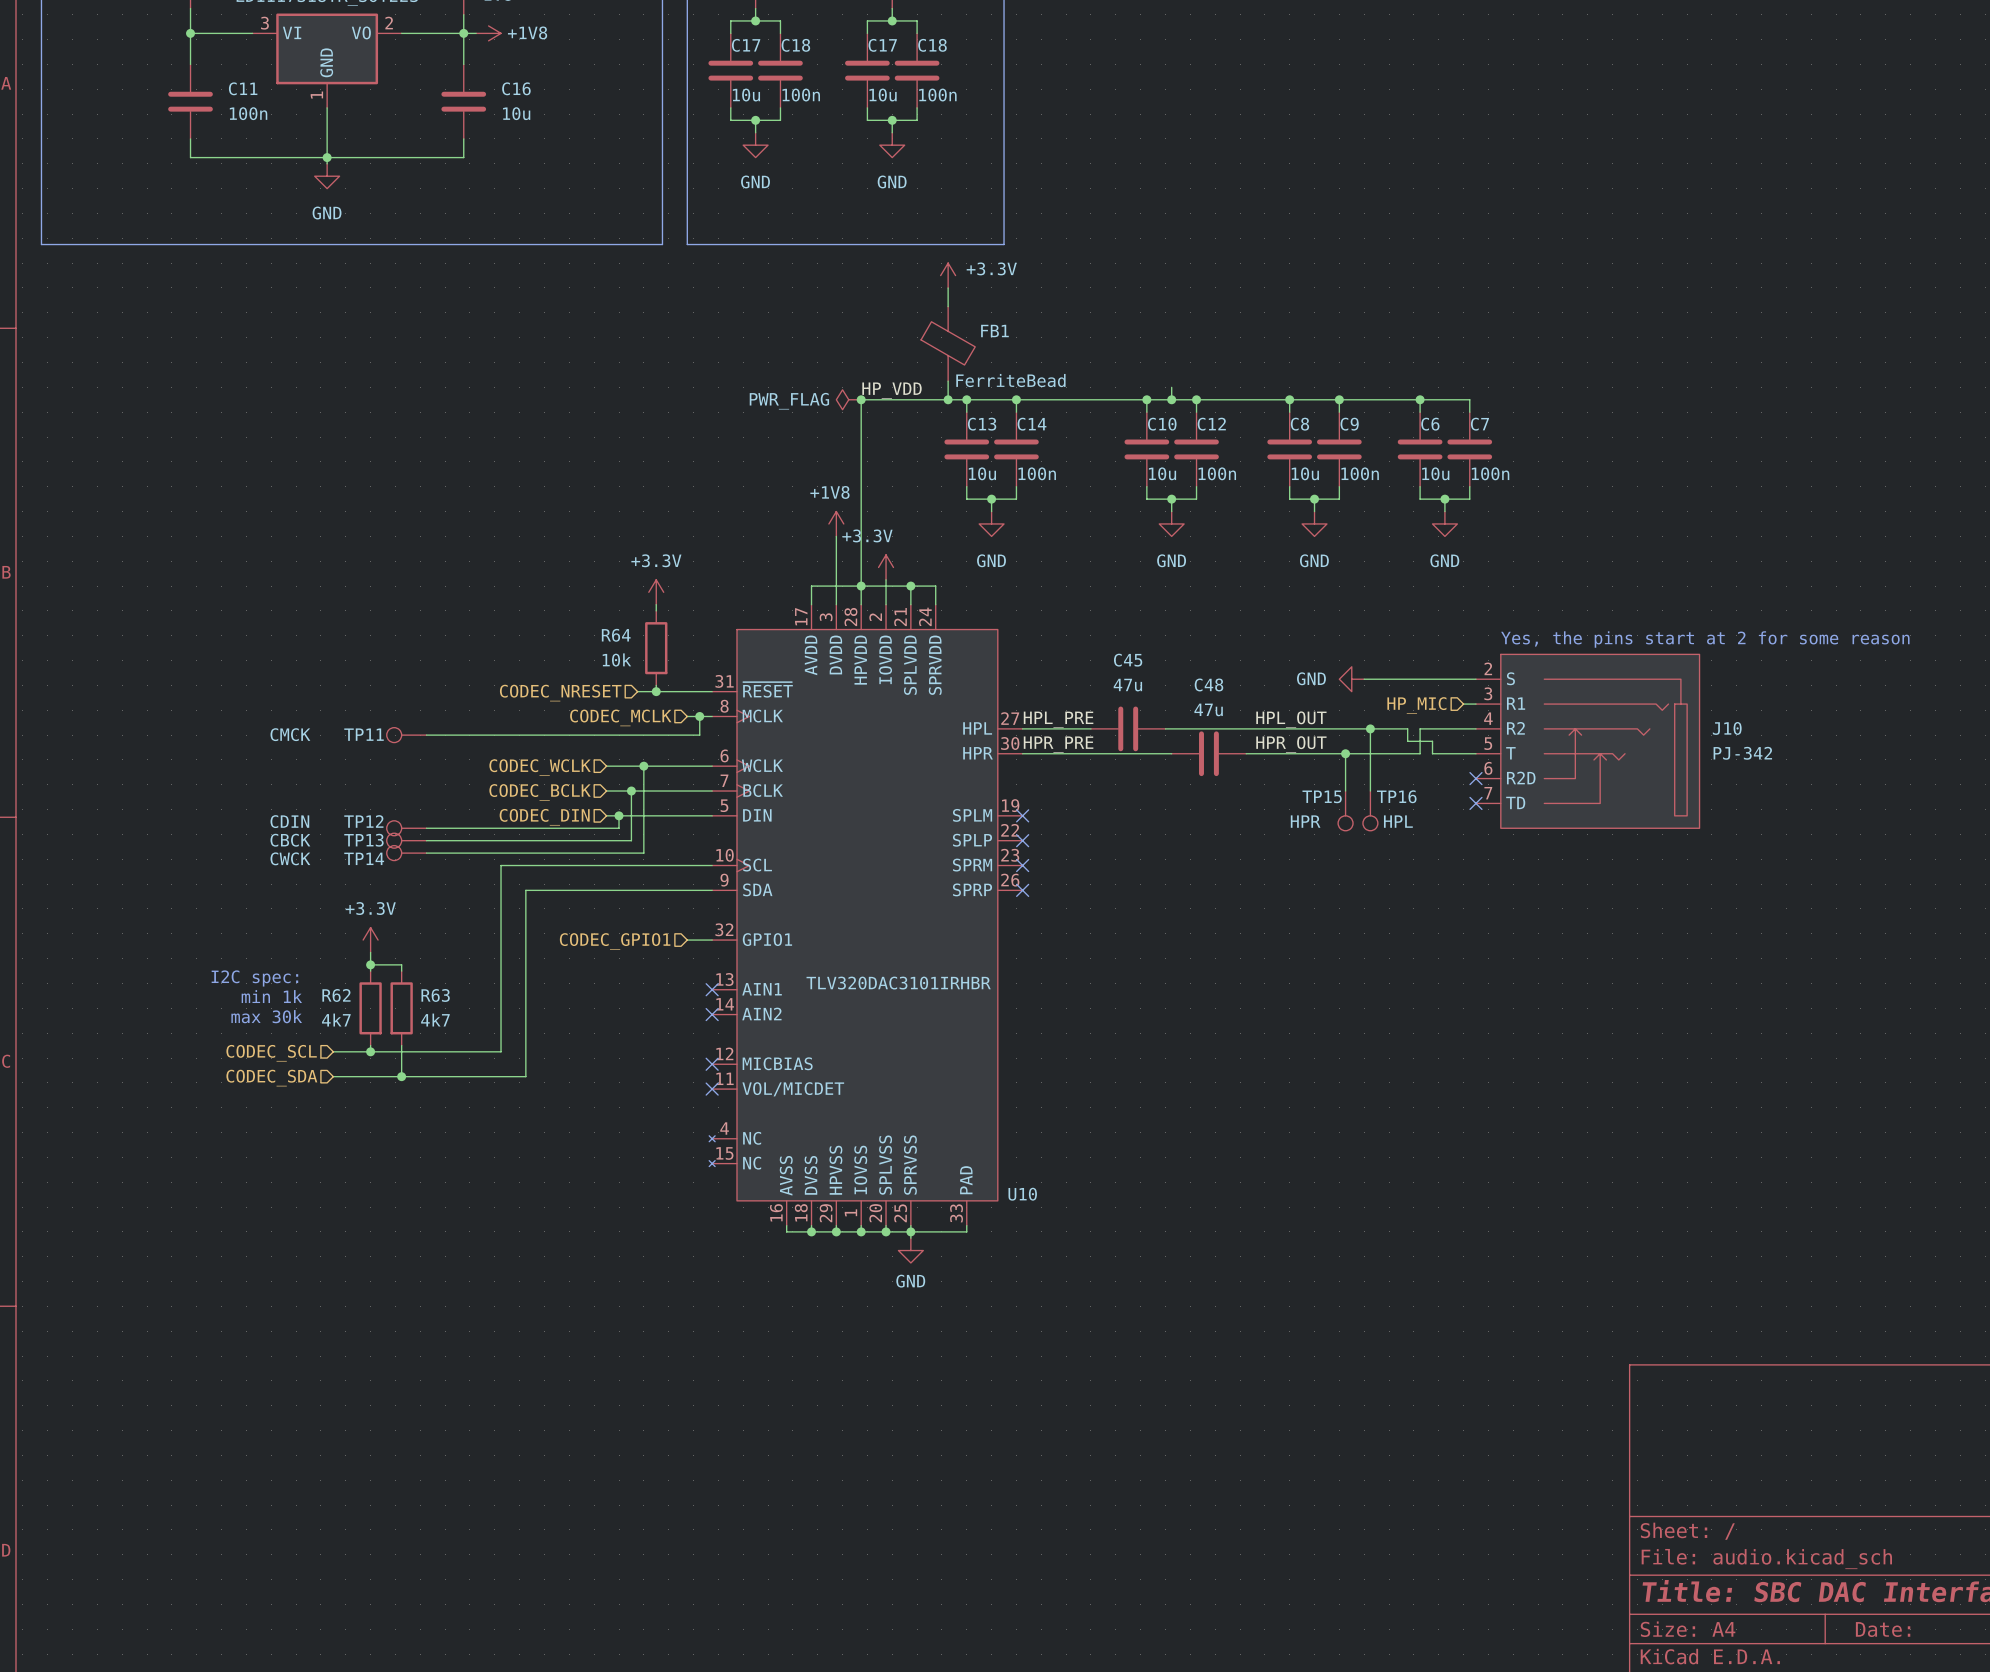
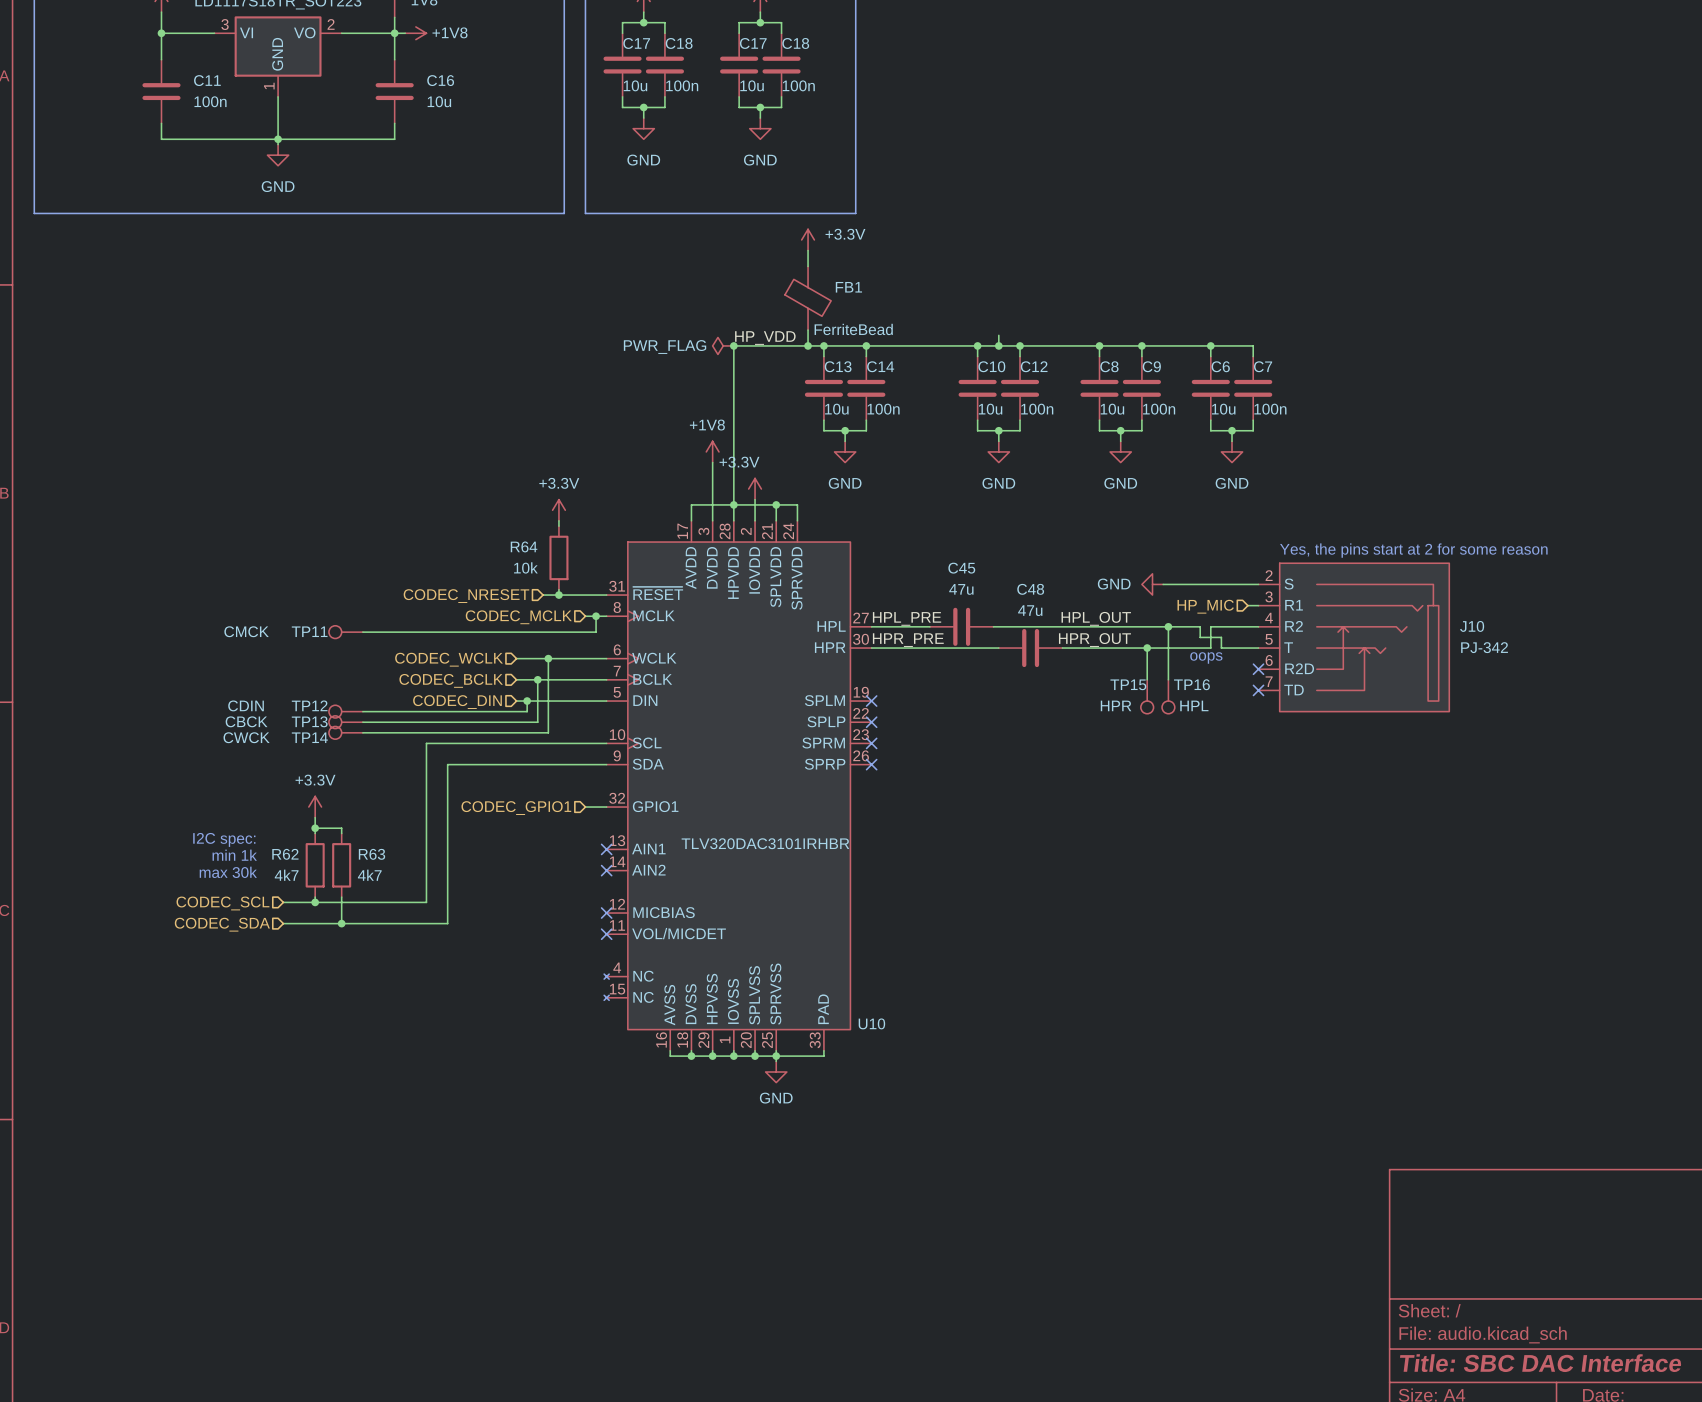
text: none -> oops (1206, 658)

